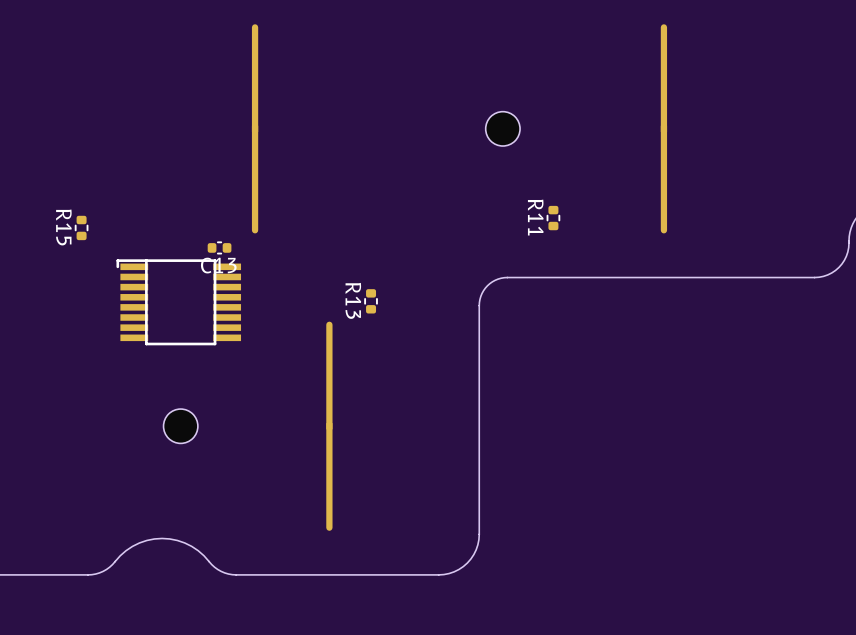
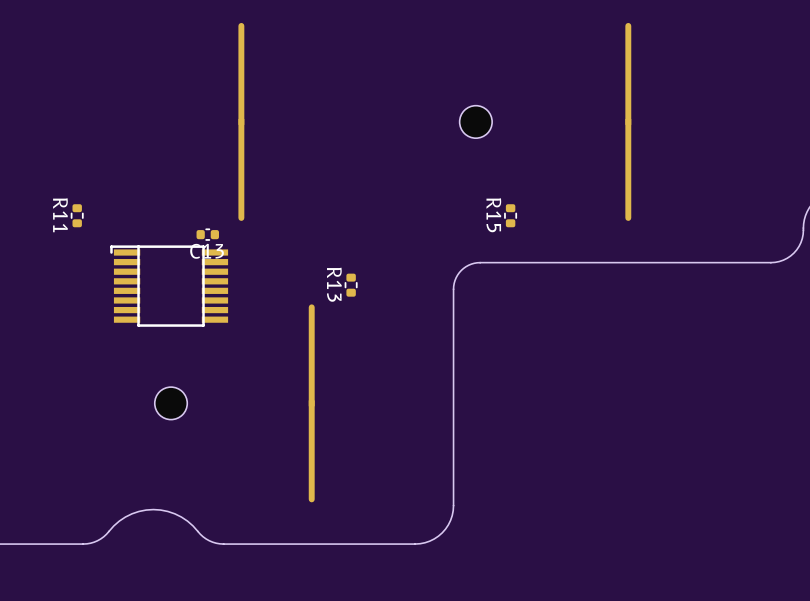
R11: (553, 218) -> none
R15 name: R15 (63, 227) -> R11 (60, 215)
R15: none -> (510, 215)

